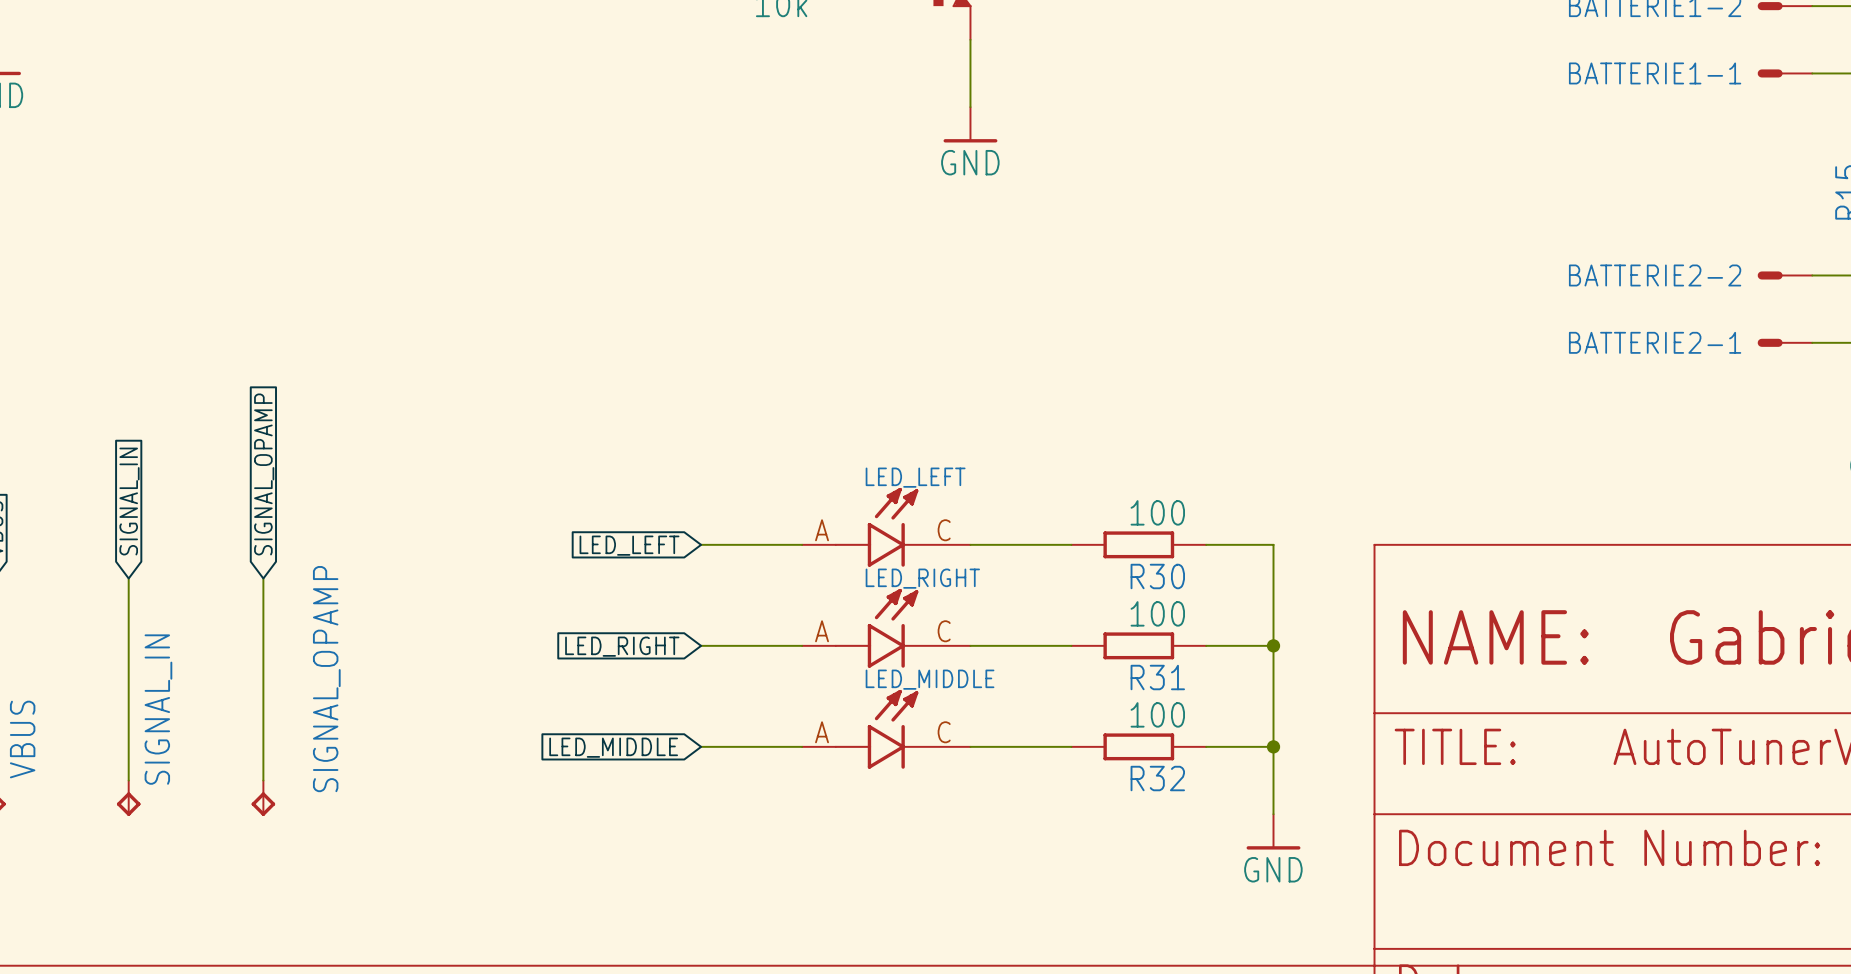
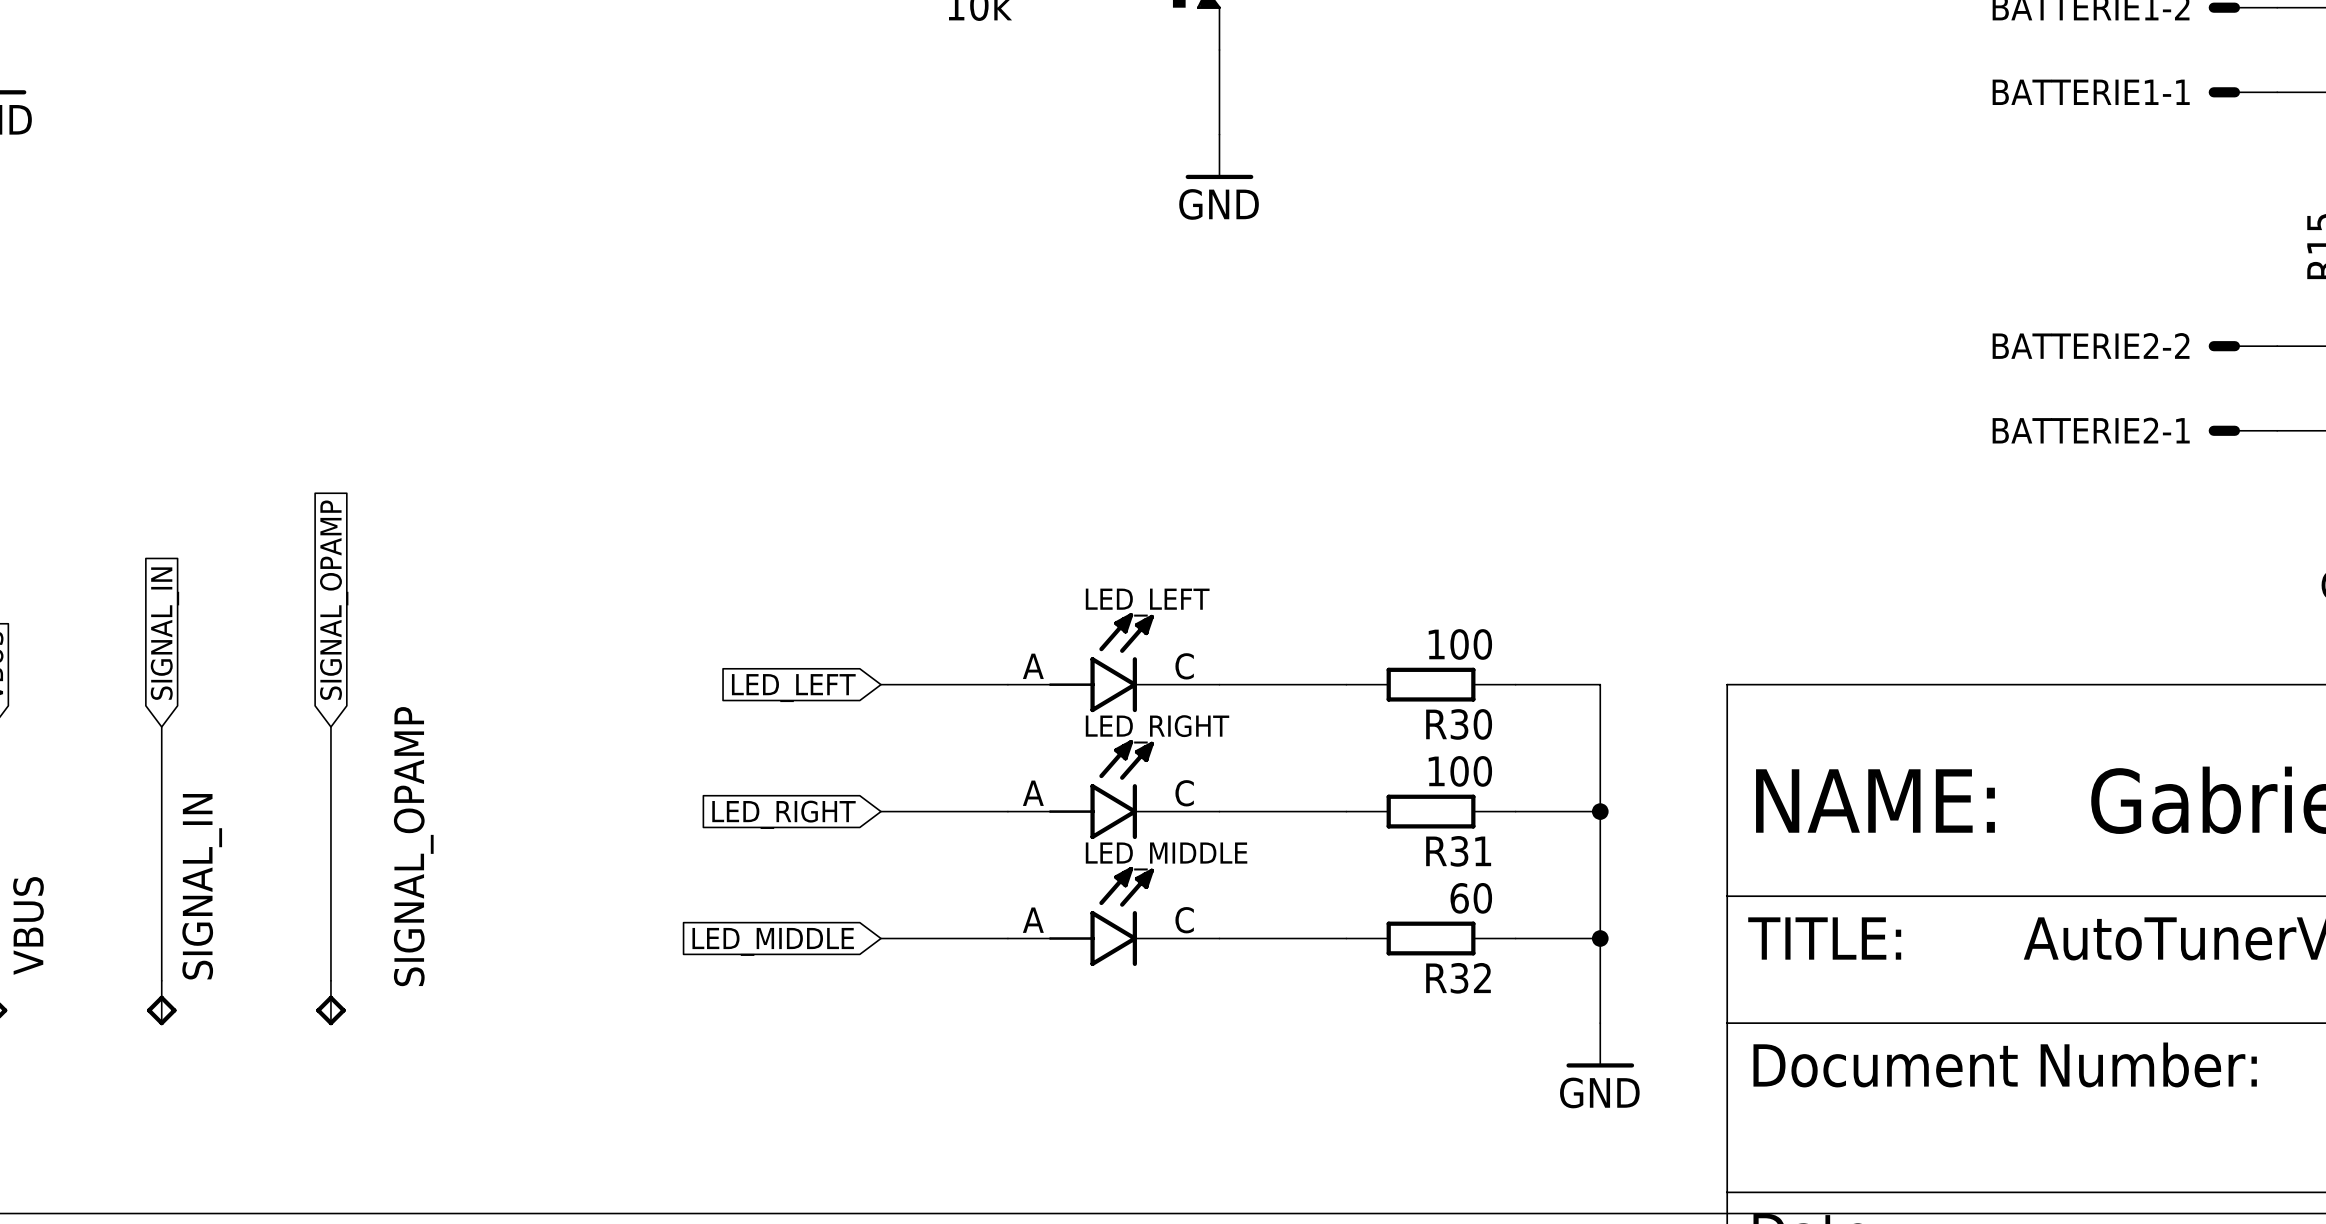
R32 value: 100 (1157, 714) -> 60 (1471, 898)

